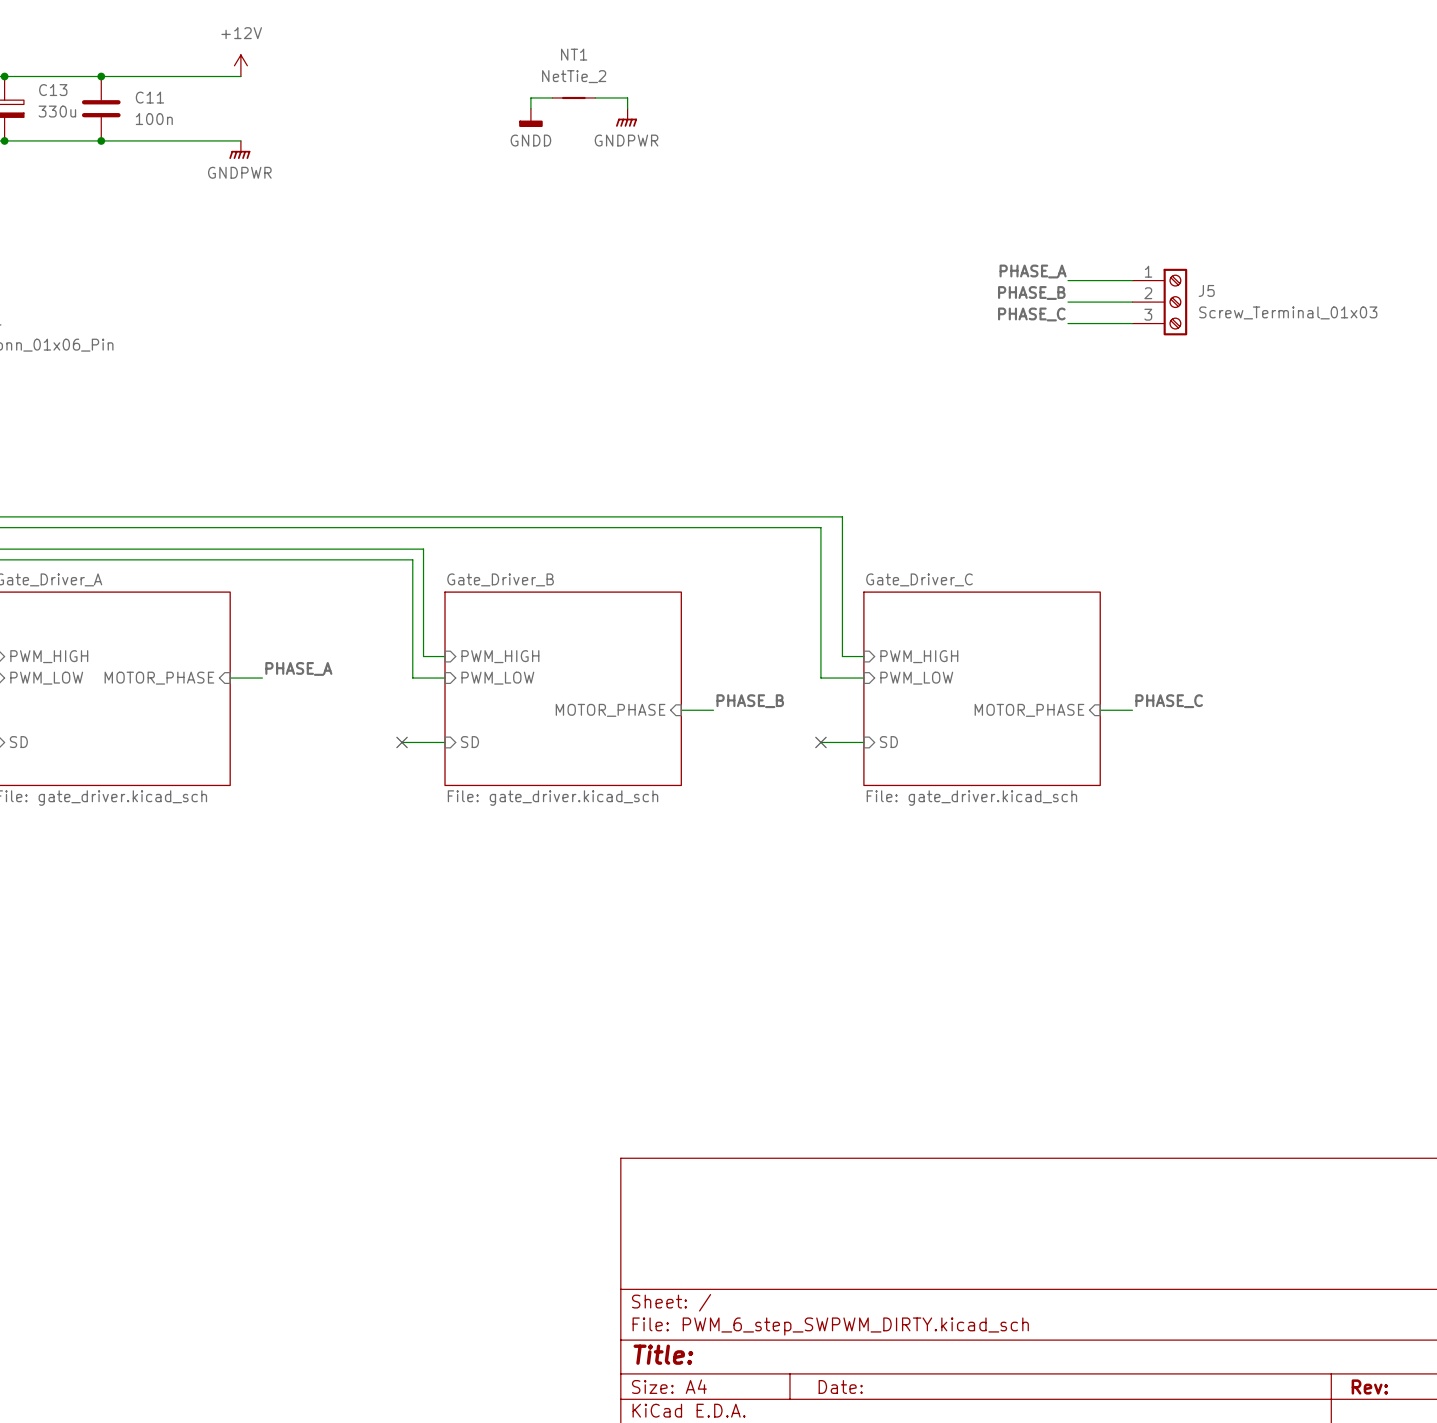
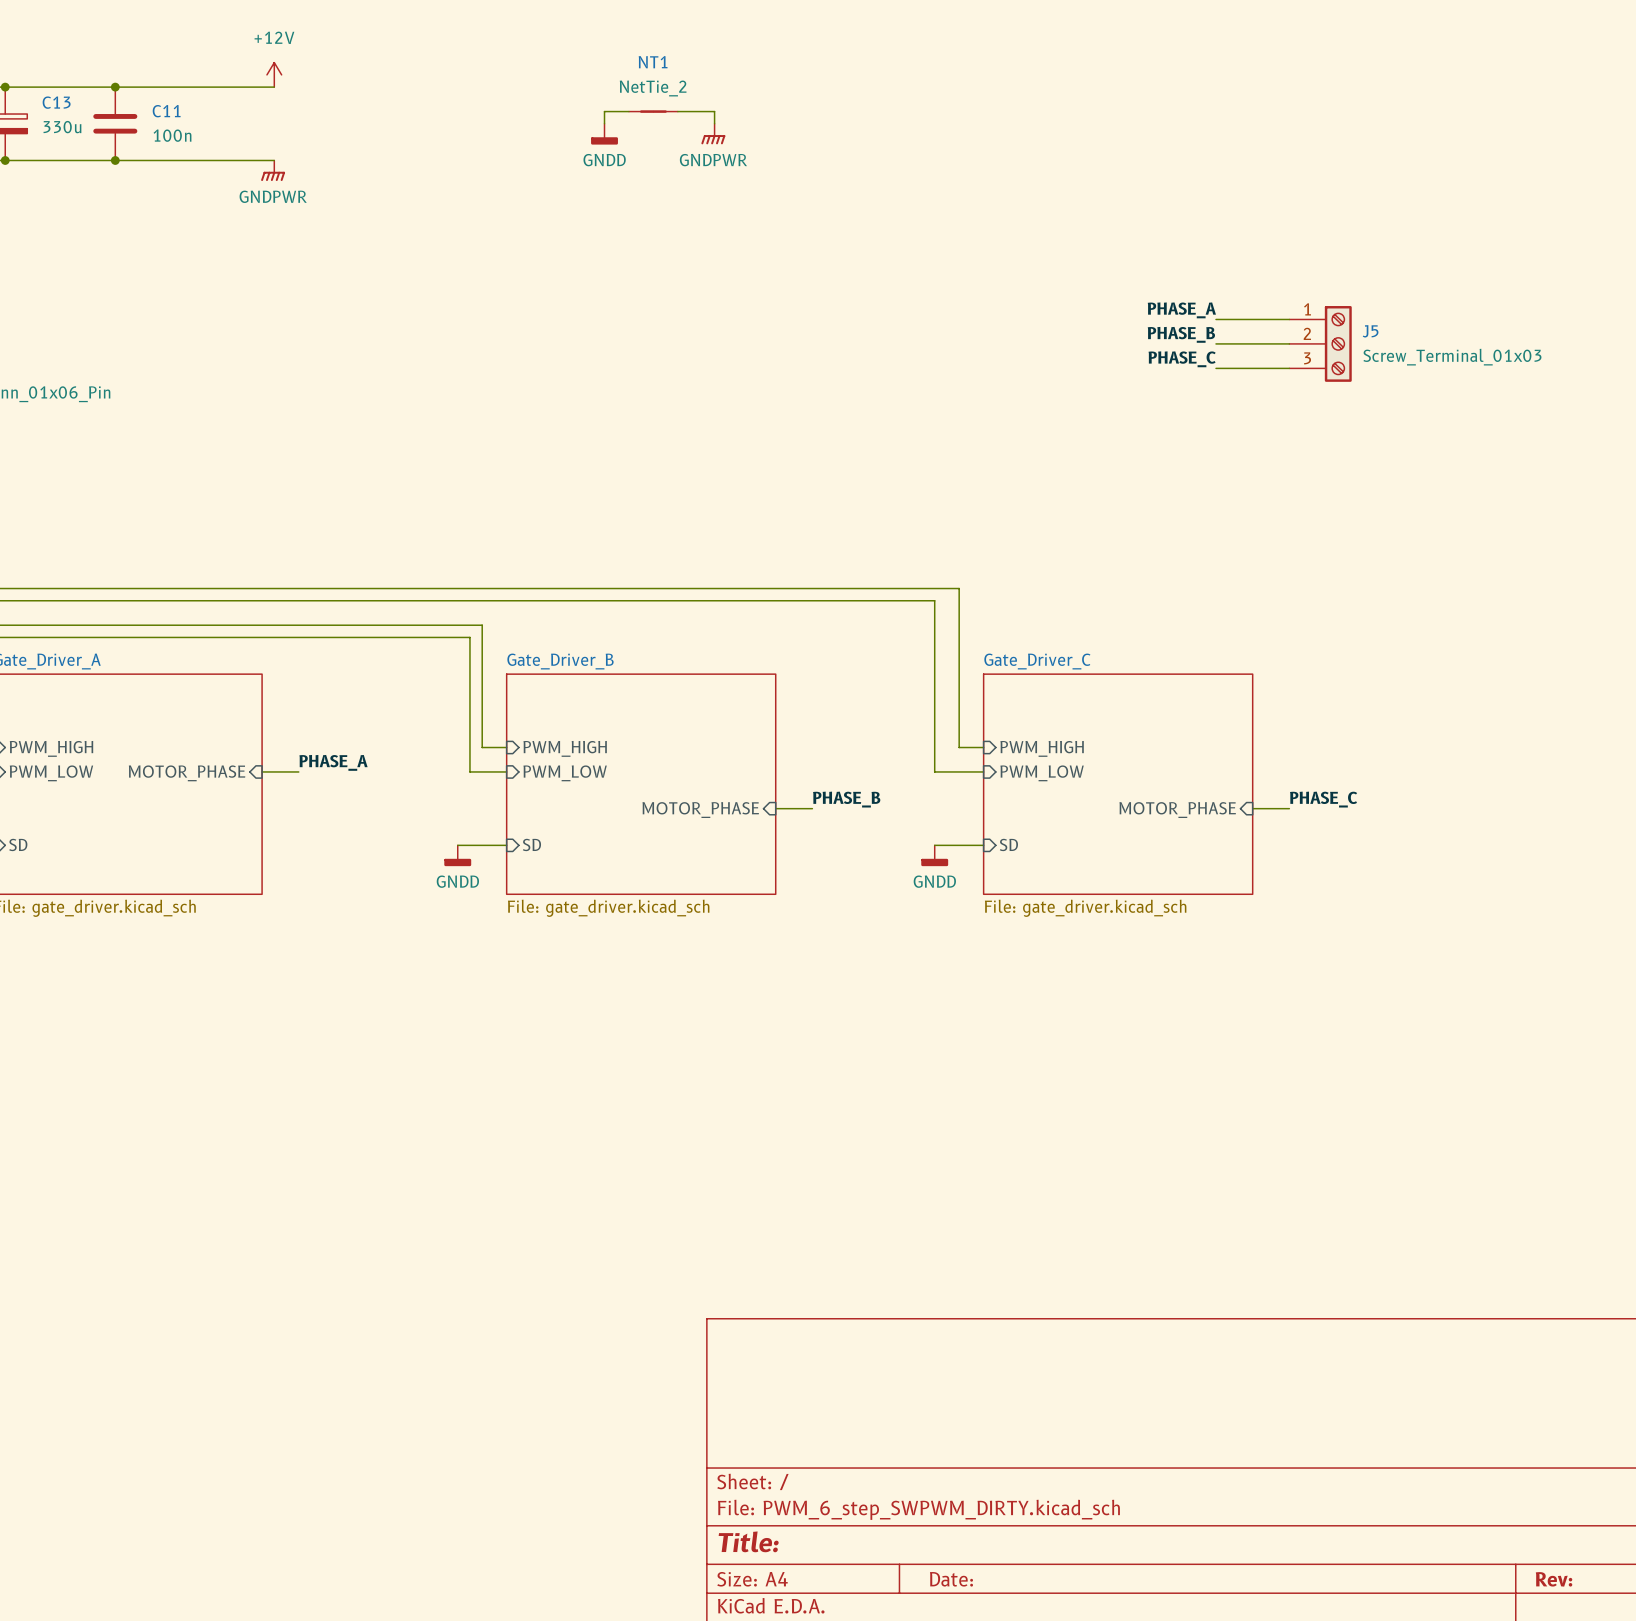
no-connect mark: (402, 742) -> none
no-connect mark: (820, 742) -> none
power symbol: none -> GNDD (457, 855)
power symbol: none -> GNDD (934, 855)

